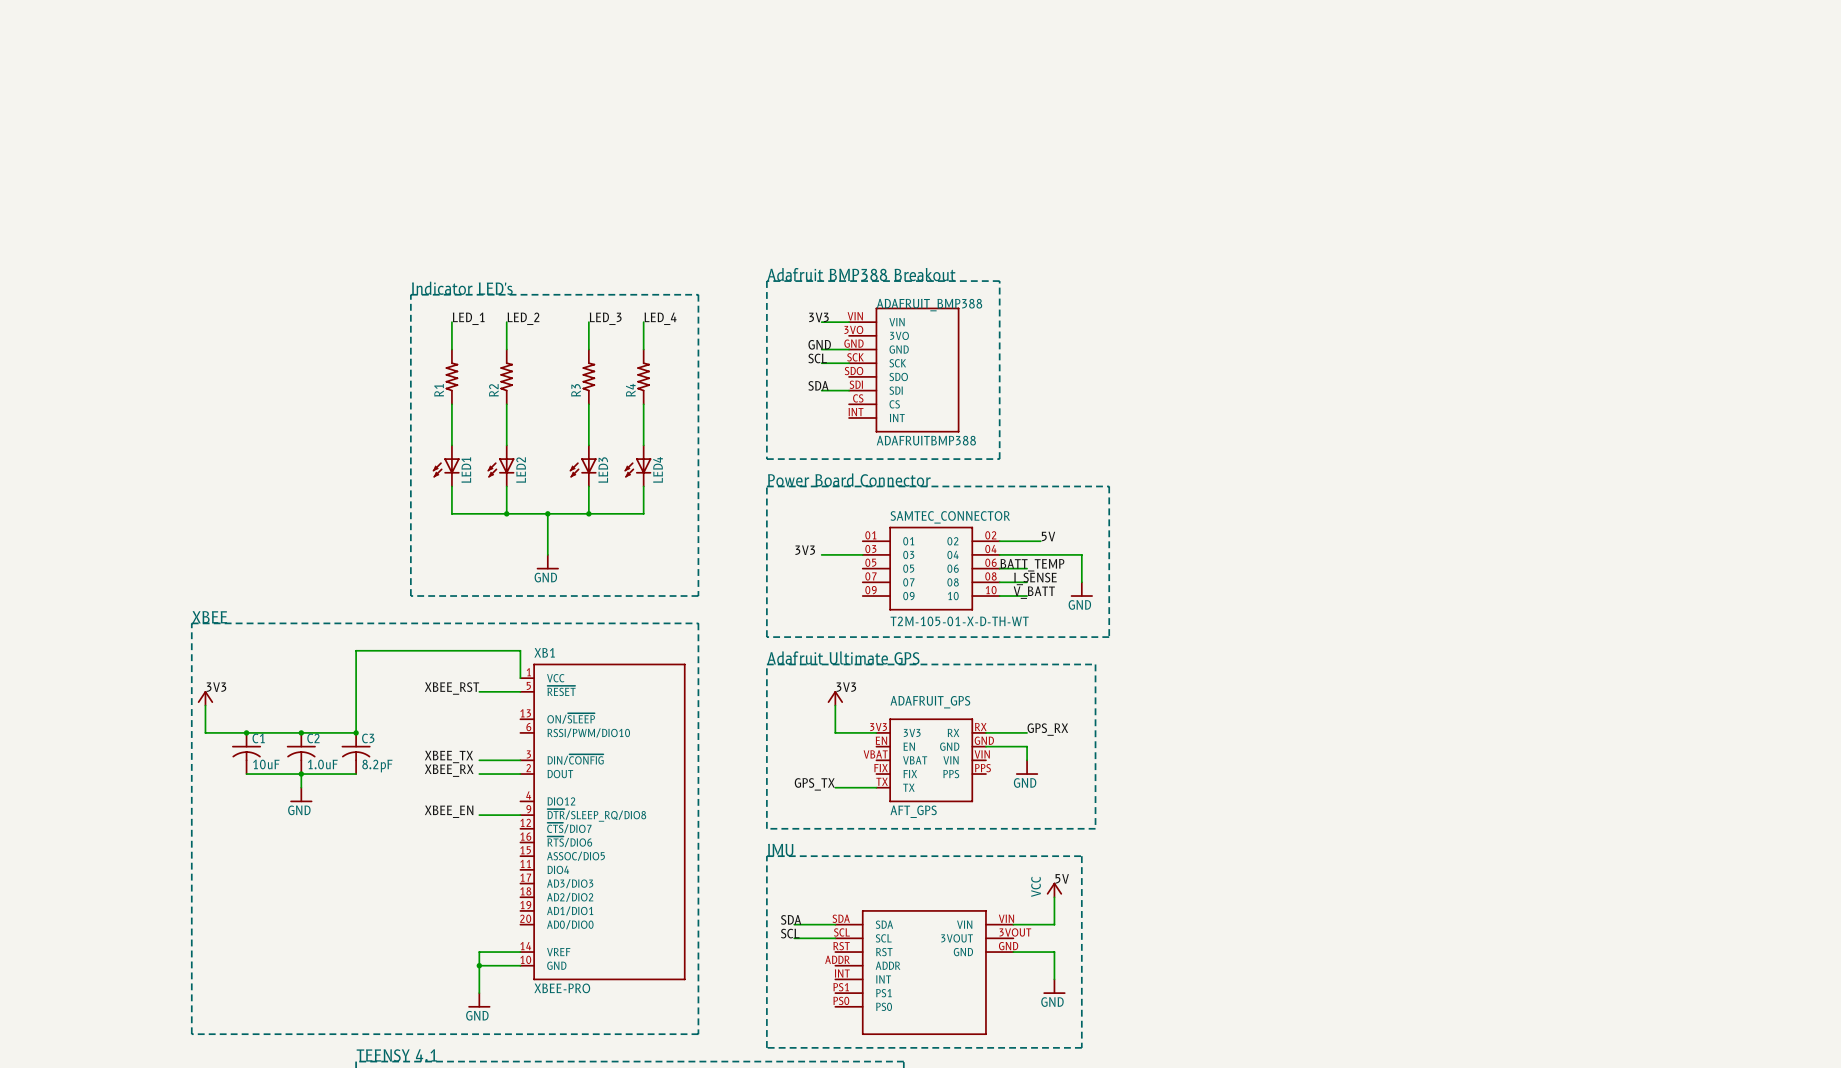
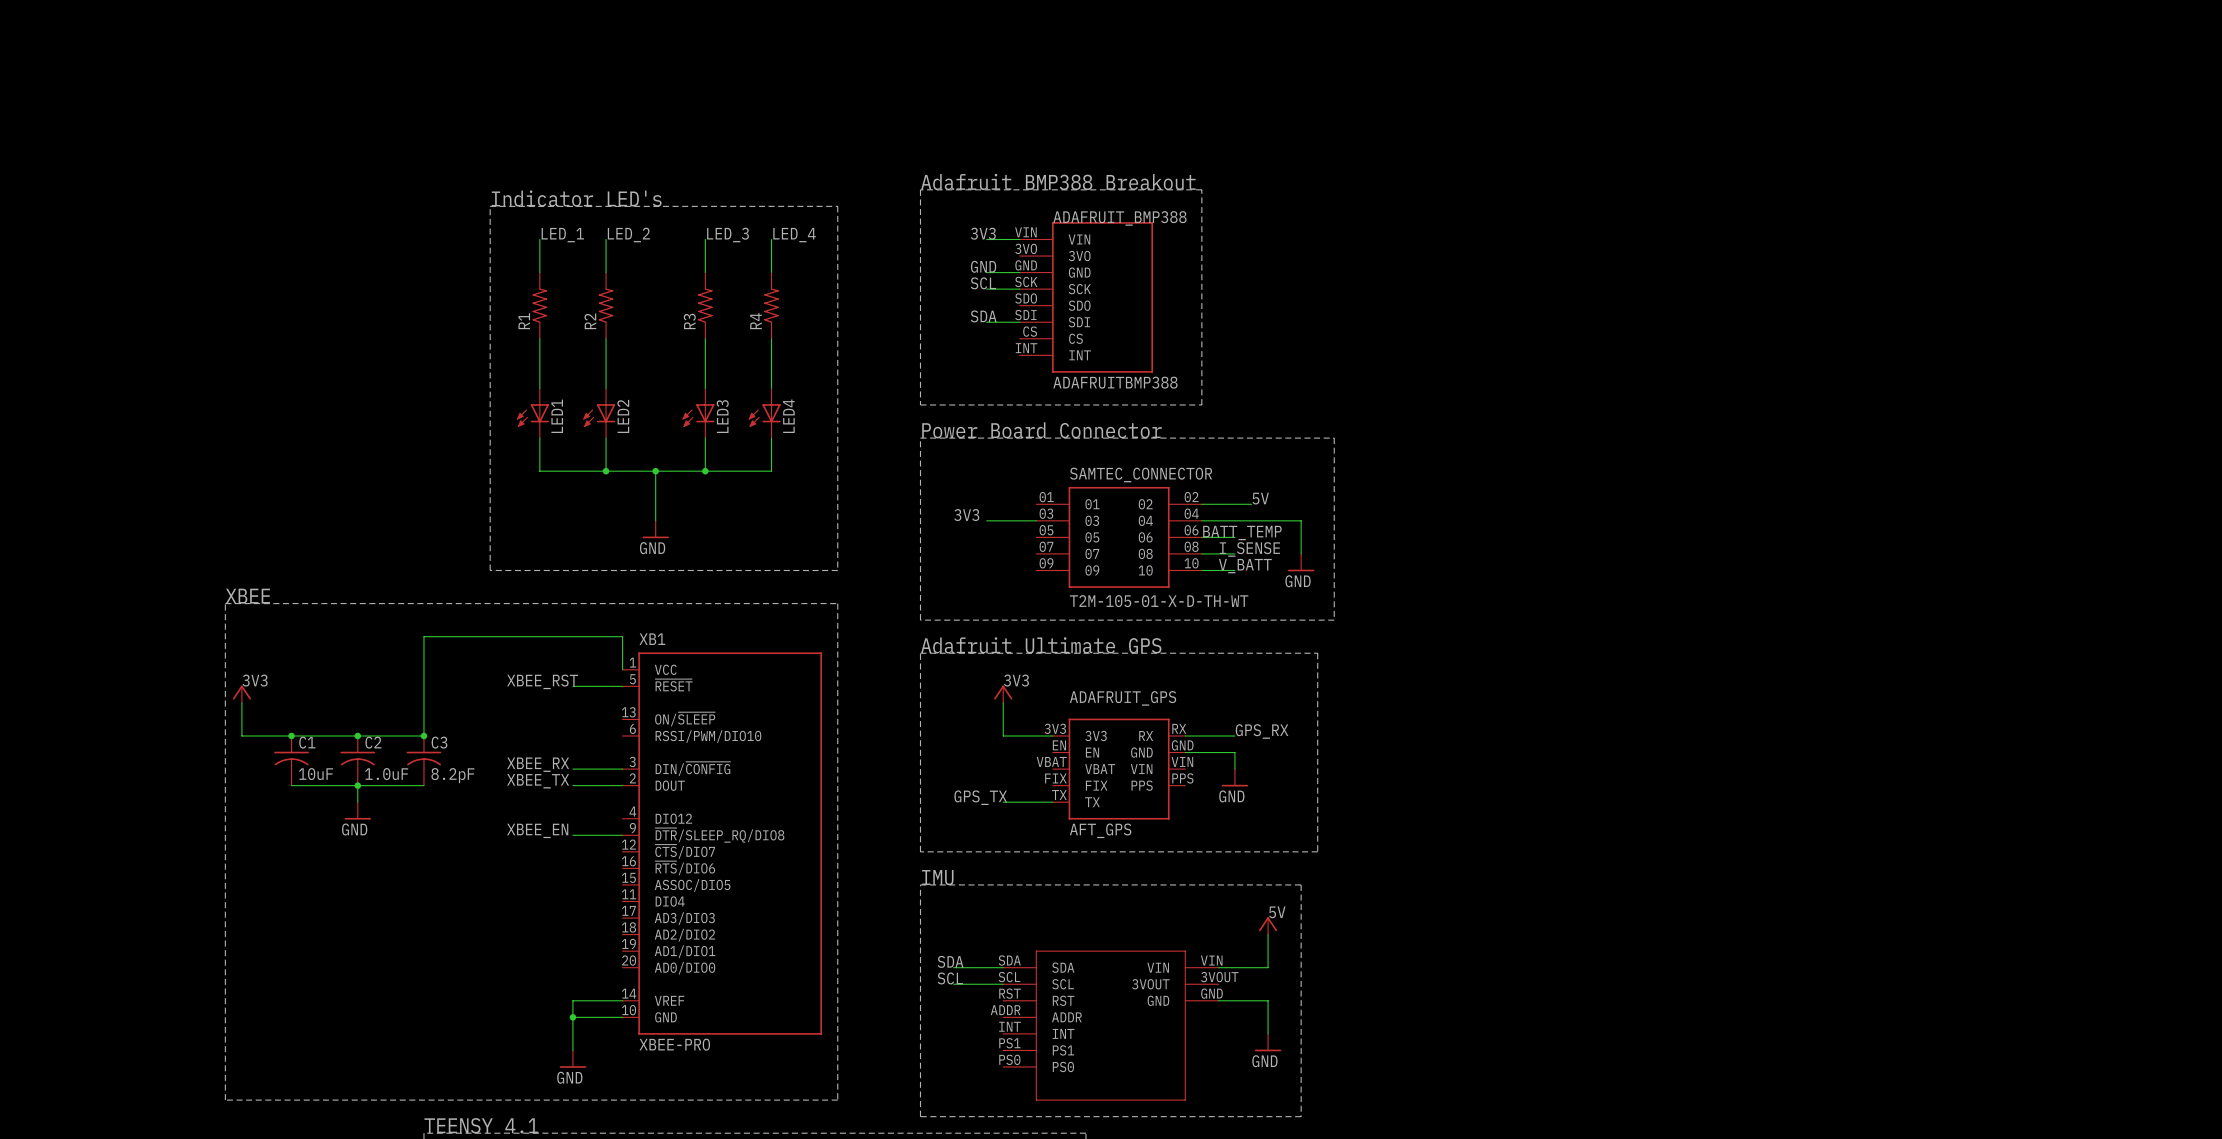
label: XBEE_TX (448, 756) -> XBEE_RX (538, 764)
label: XBEE_RX (449, 770) -> XBEE_TX (538, 781)
power symbol text: VCC (1036, 886) -> none

